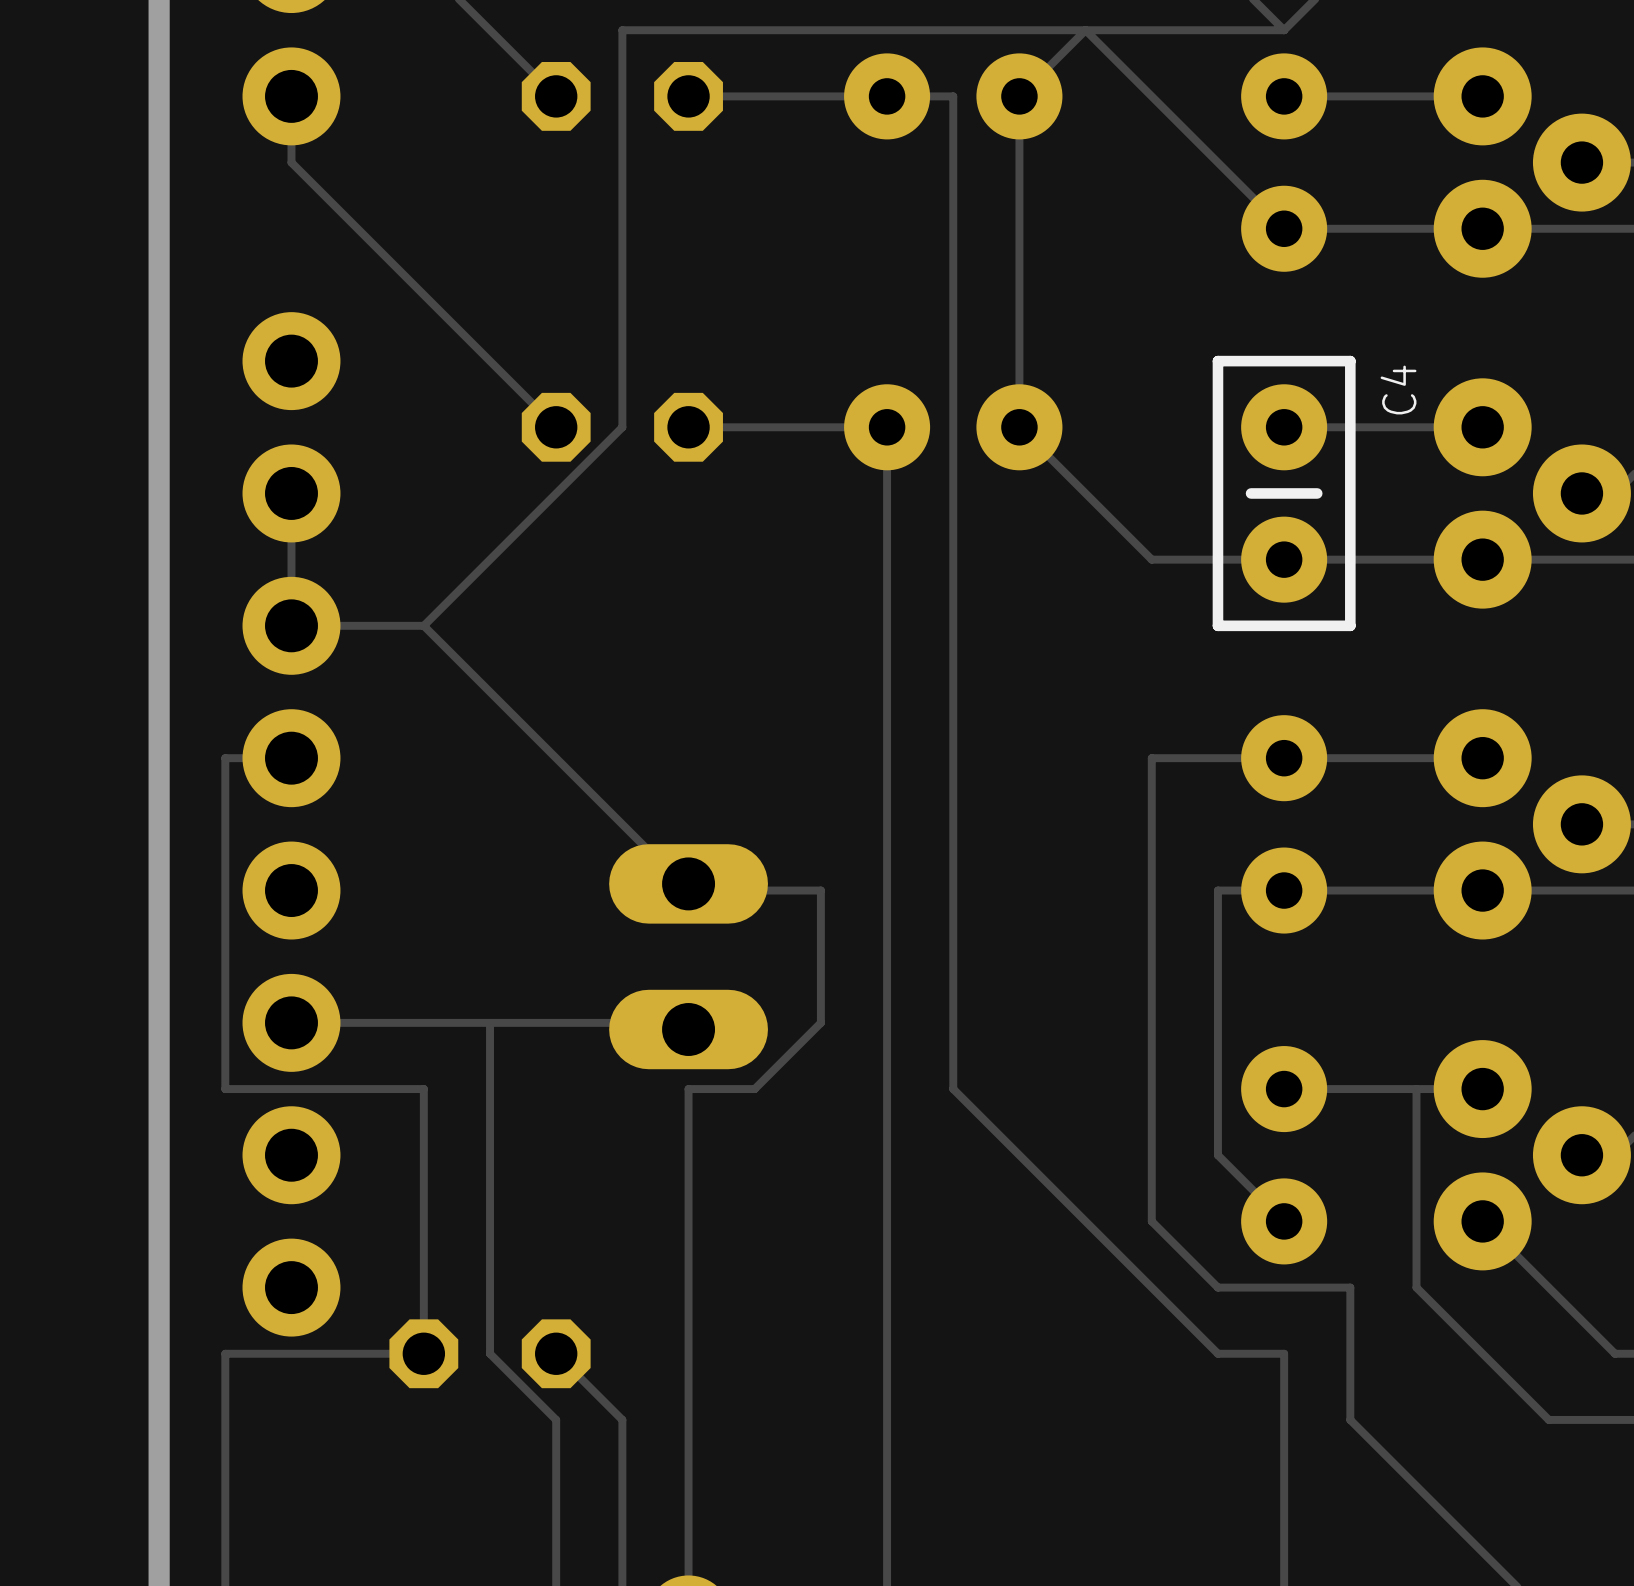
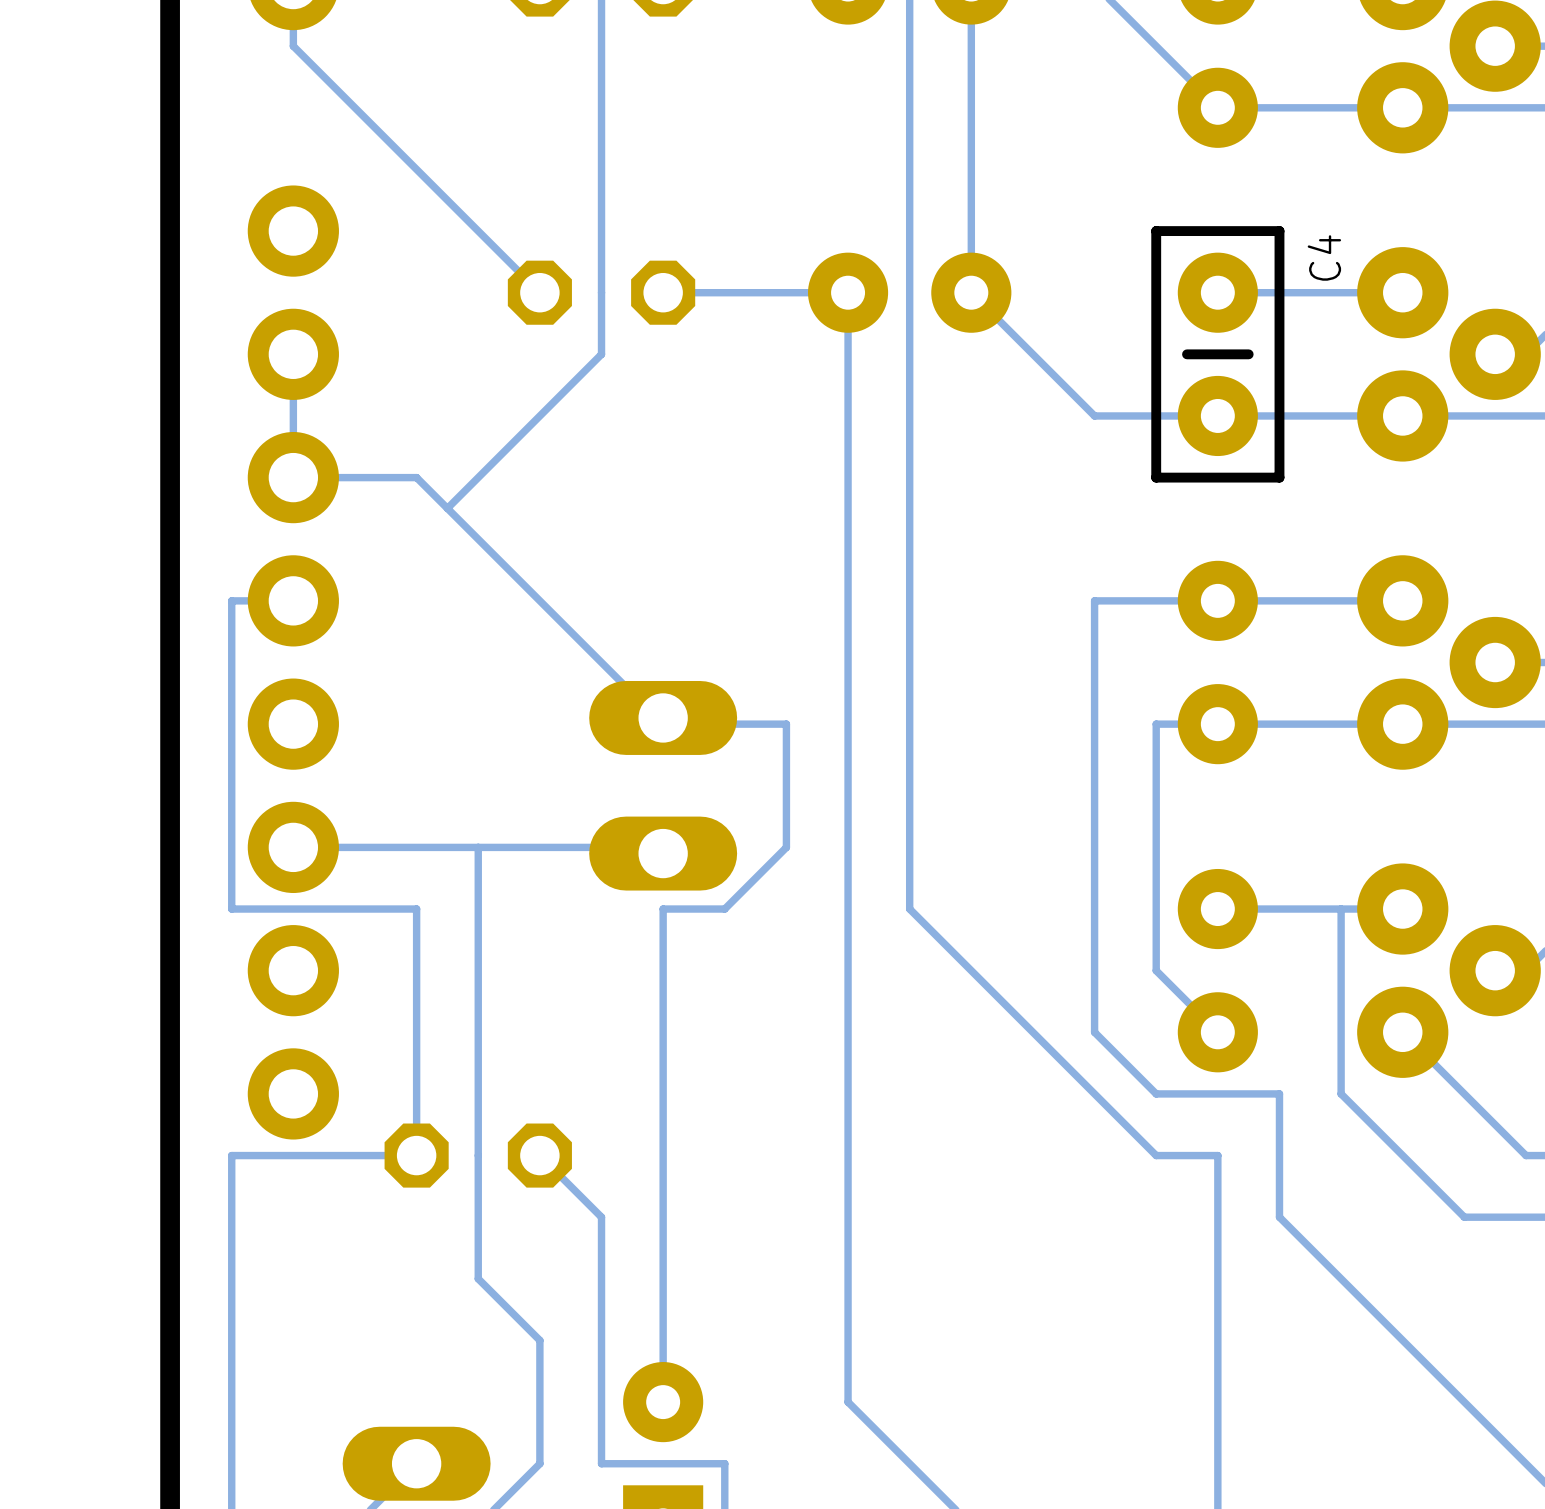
track: (622, 427) (423, 625) -> (601, 292) (601, 354) (447, 508)
track: (490, 1353) (556, 1419) (556, 1552) -> (478, 1155) (478, 1278) (539, 1340)

